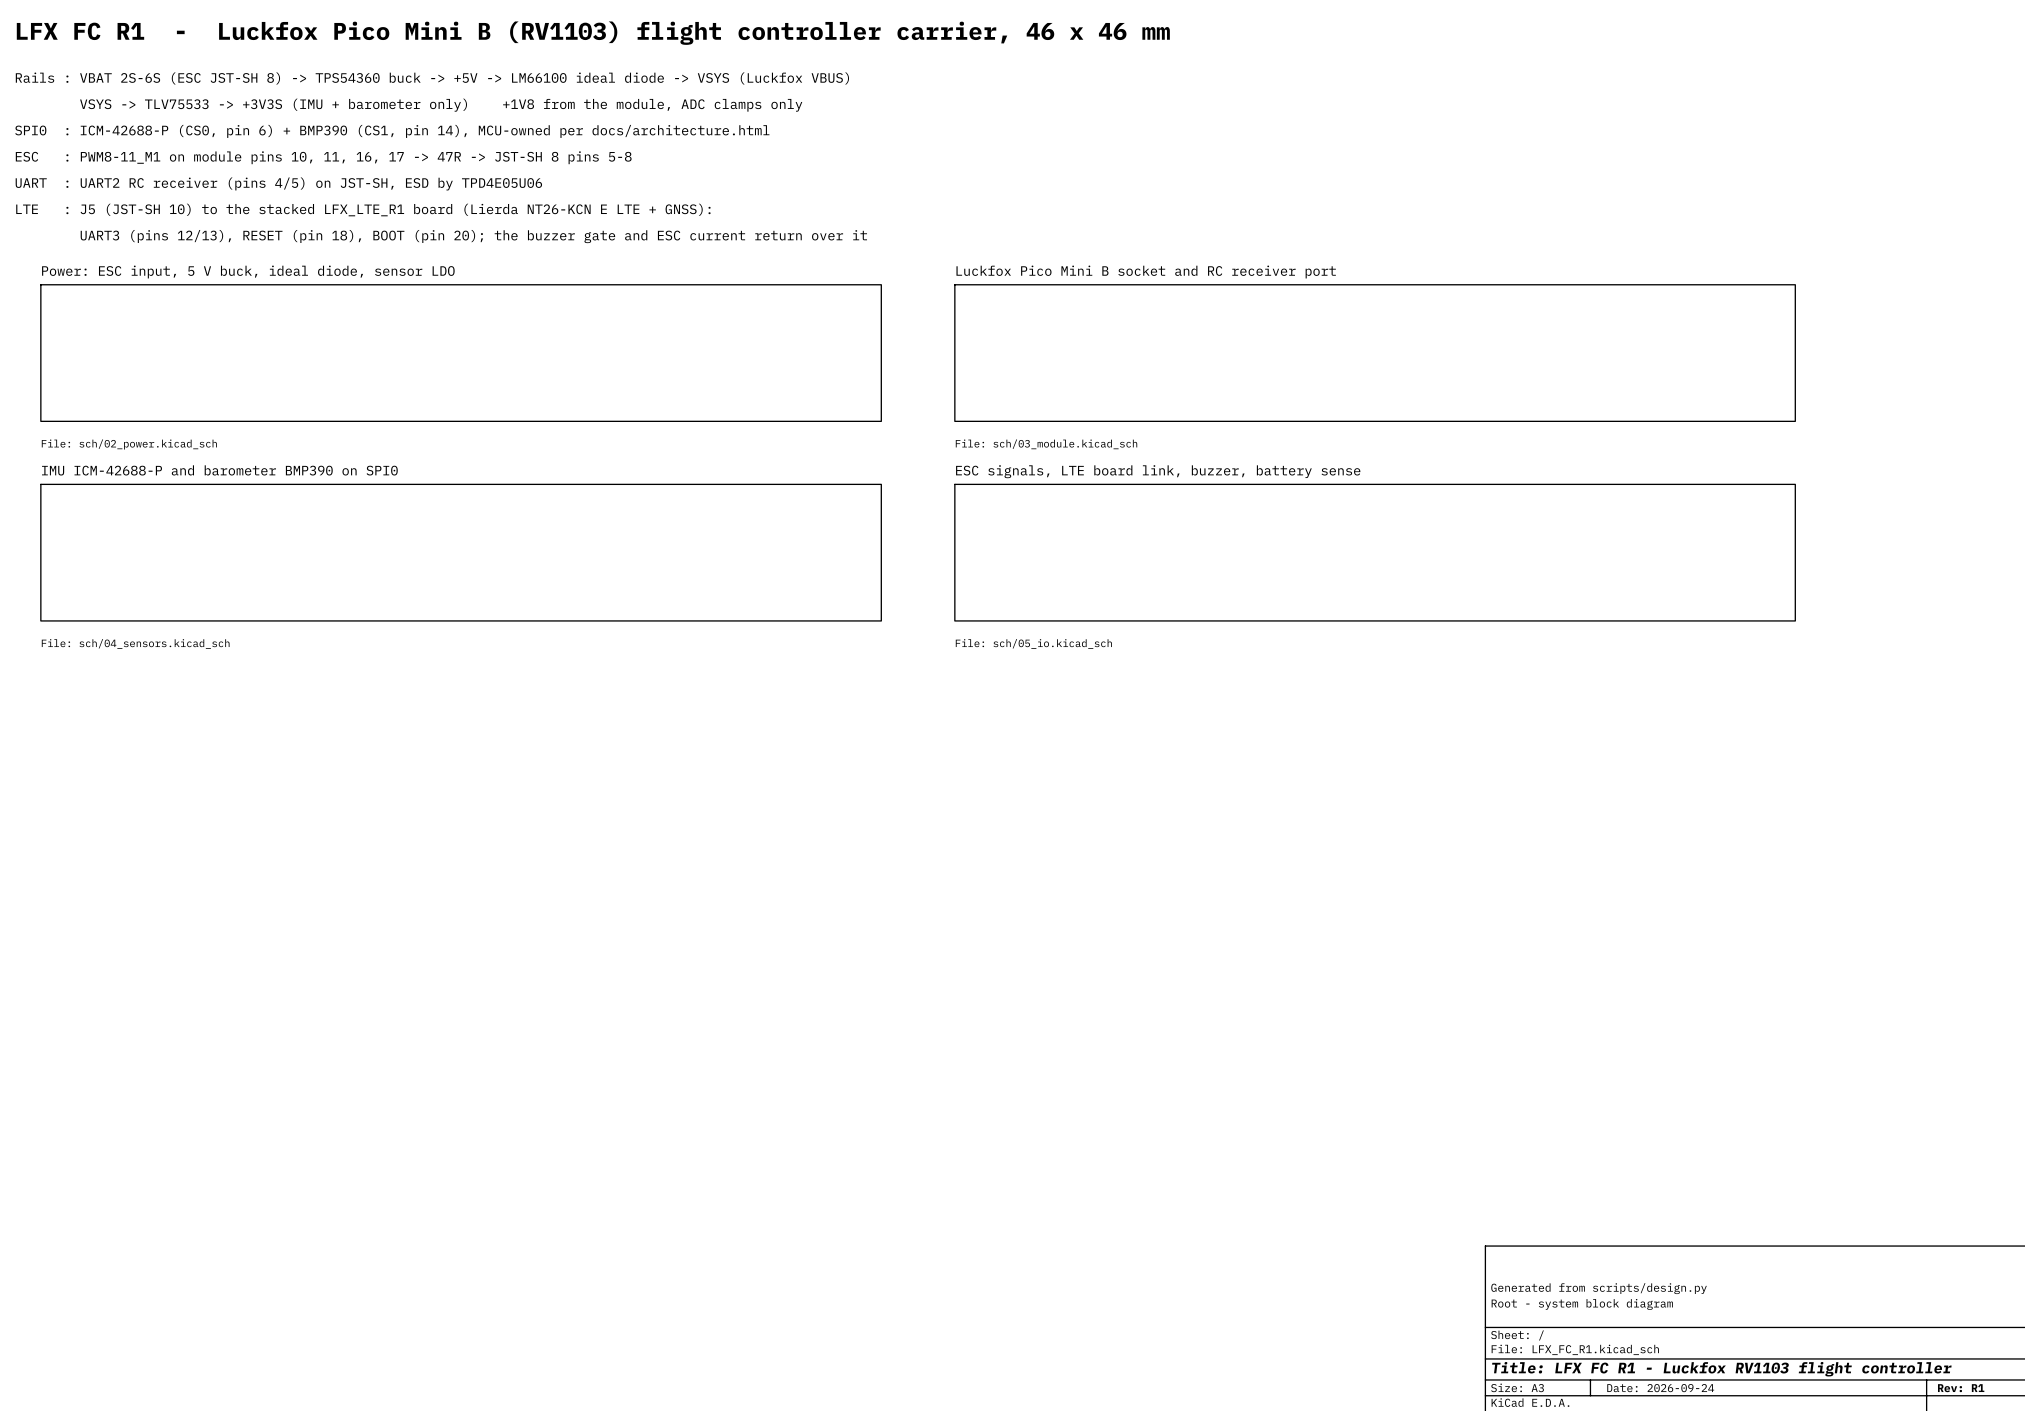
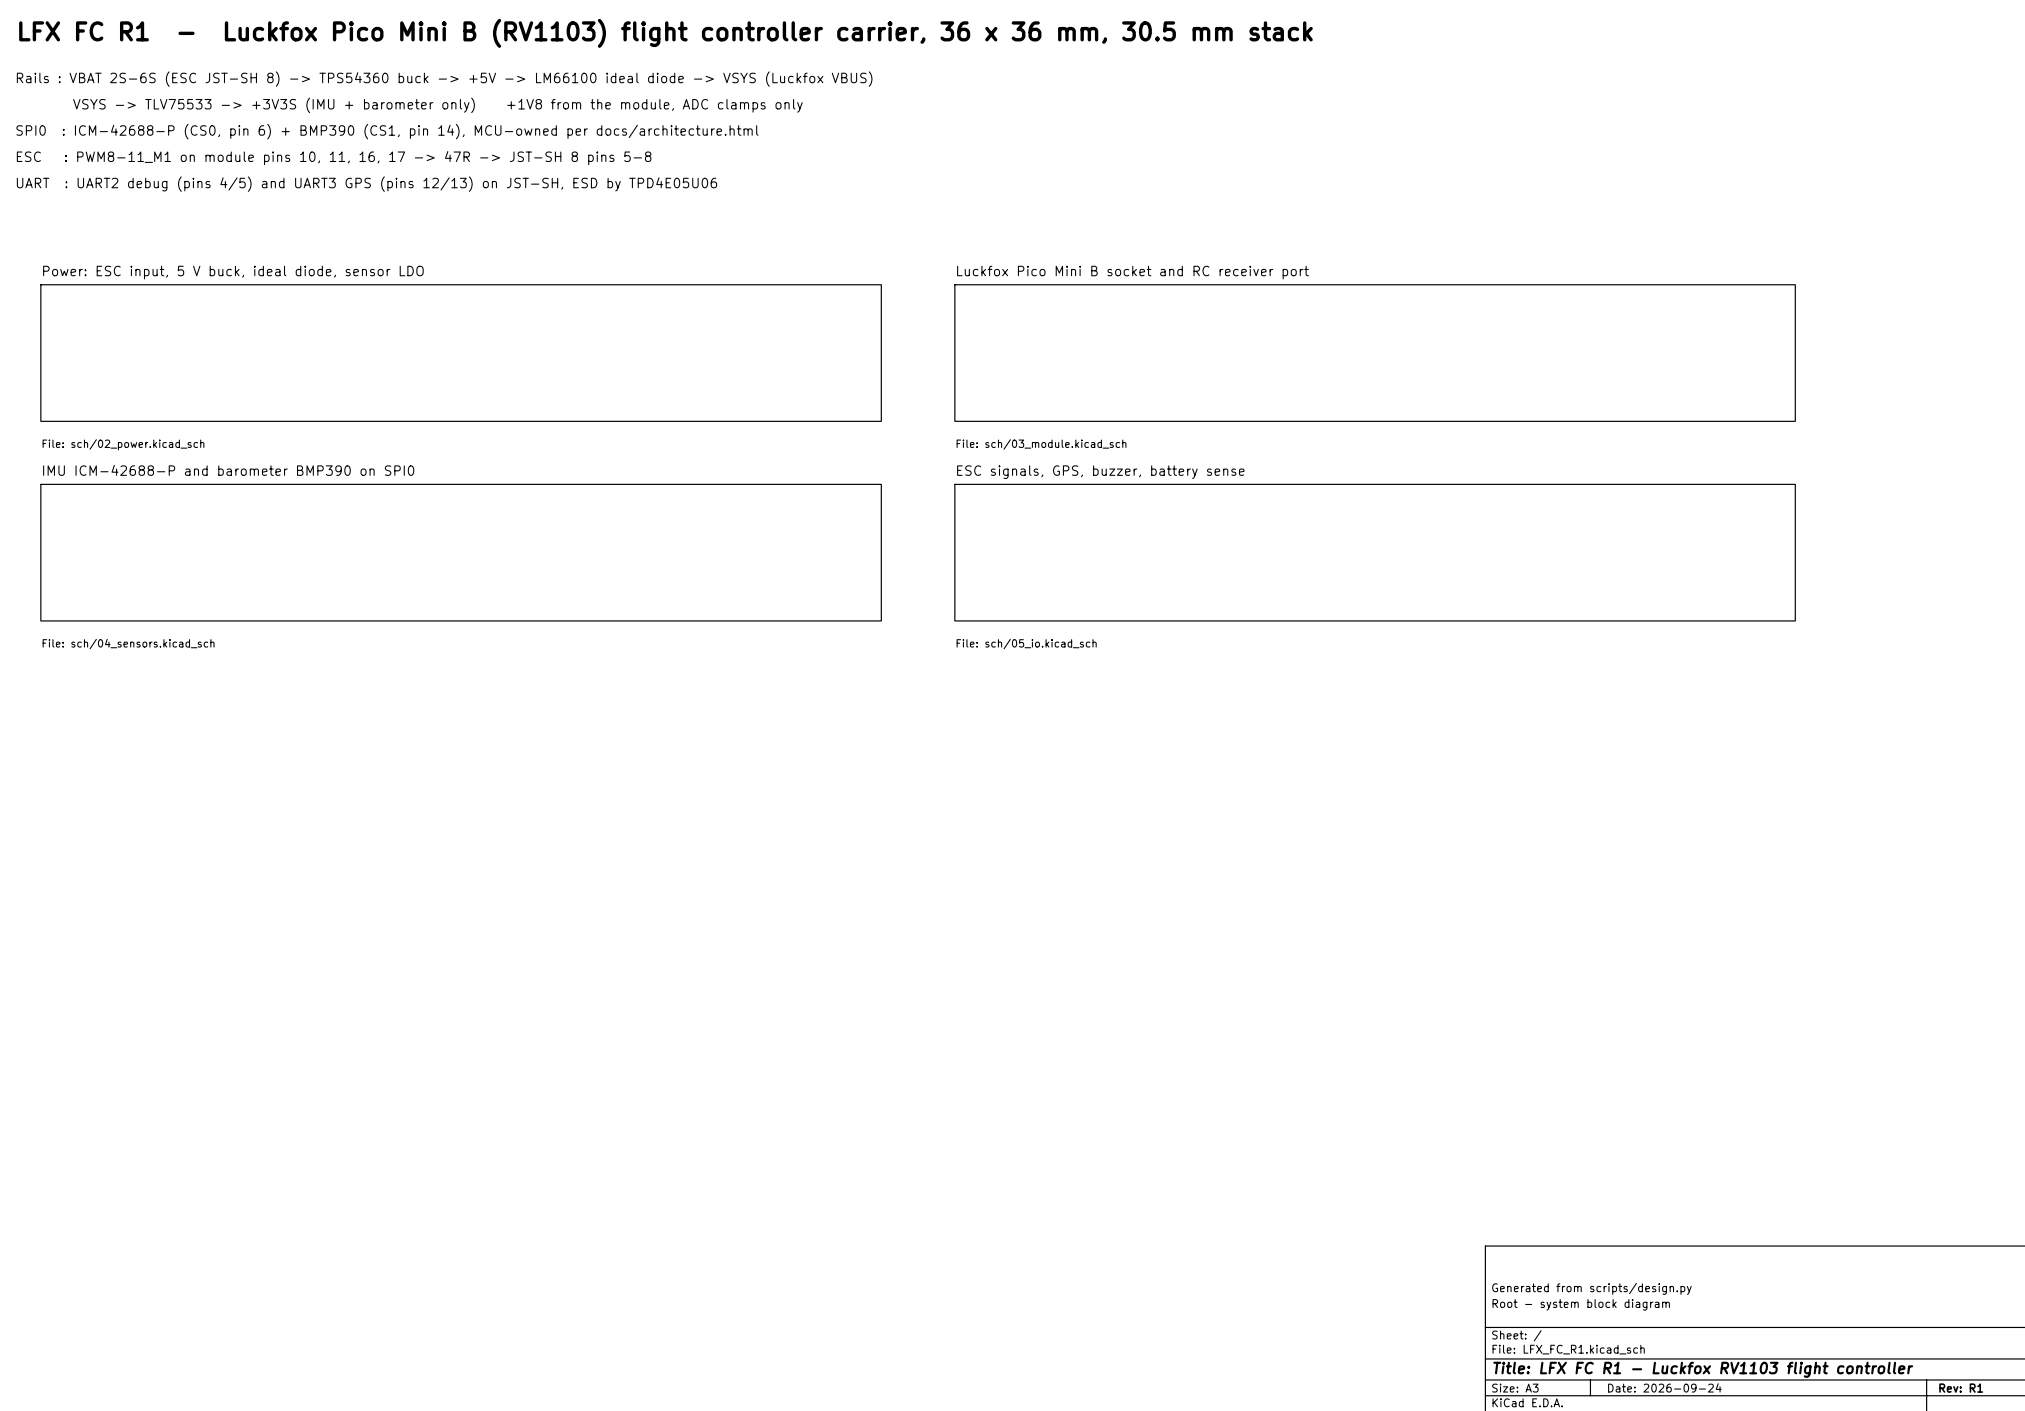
text: LFX FC R1 - Luckfox Pico Mini B (RV1103) flight controller carrier, 46 x 46 mm (593, 33) -> LFX FC R1 - Luckfox Pico Mini B (RV1103) flight controller carrier, 36 x 36 mm, 30.5 mm stack (665, 33)
text: UART : UART2 RC receiver (pins 4/5) on JST-SH, ESD by TPD4E05U06 (278, 183) -> UART : UART2 debug (pins 4/5) and UART3 GPS (pins 12/13) on JST-SH, ESD by TPD4E05U06 (366, 184)
text: LTE : J5 (JST-SH 10) to the stacked LFX_LTE_R1 board (Lierda NT26-KCN E LTE + GNSS): (363, 210) -> none
text: UART3 (pins 12/13), RESET (pin 18), BOOT (pin 20); the buzzer gate and ESC current return over it (473, 236) -> none
sheet ESC signals, LTE board link, buzzer, battery sense name: ESC signals, LTE board link, buzzer, battery sense (1158, 471) -> ESC signals, GPS, buzzer, battery sense (1100, 472)

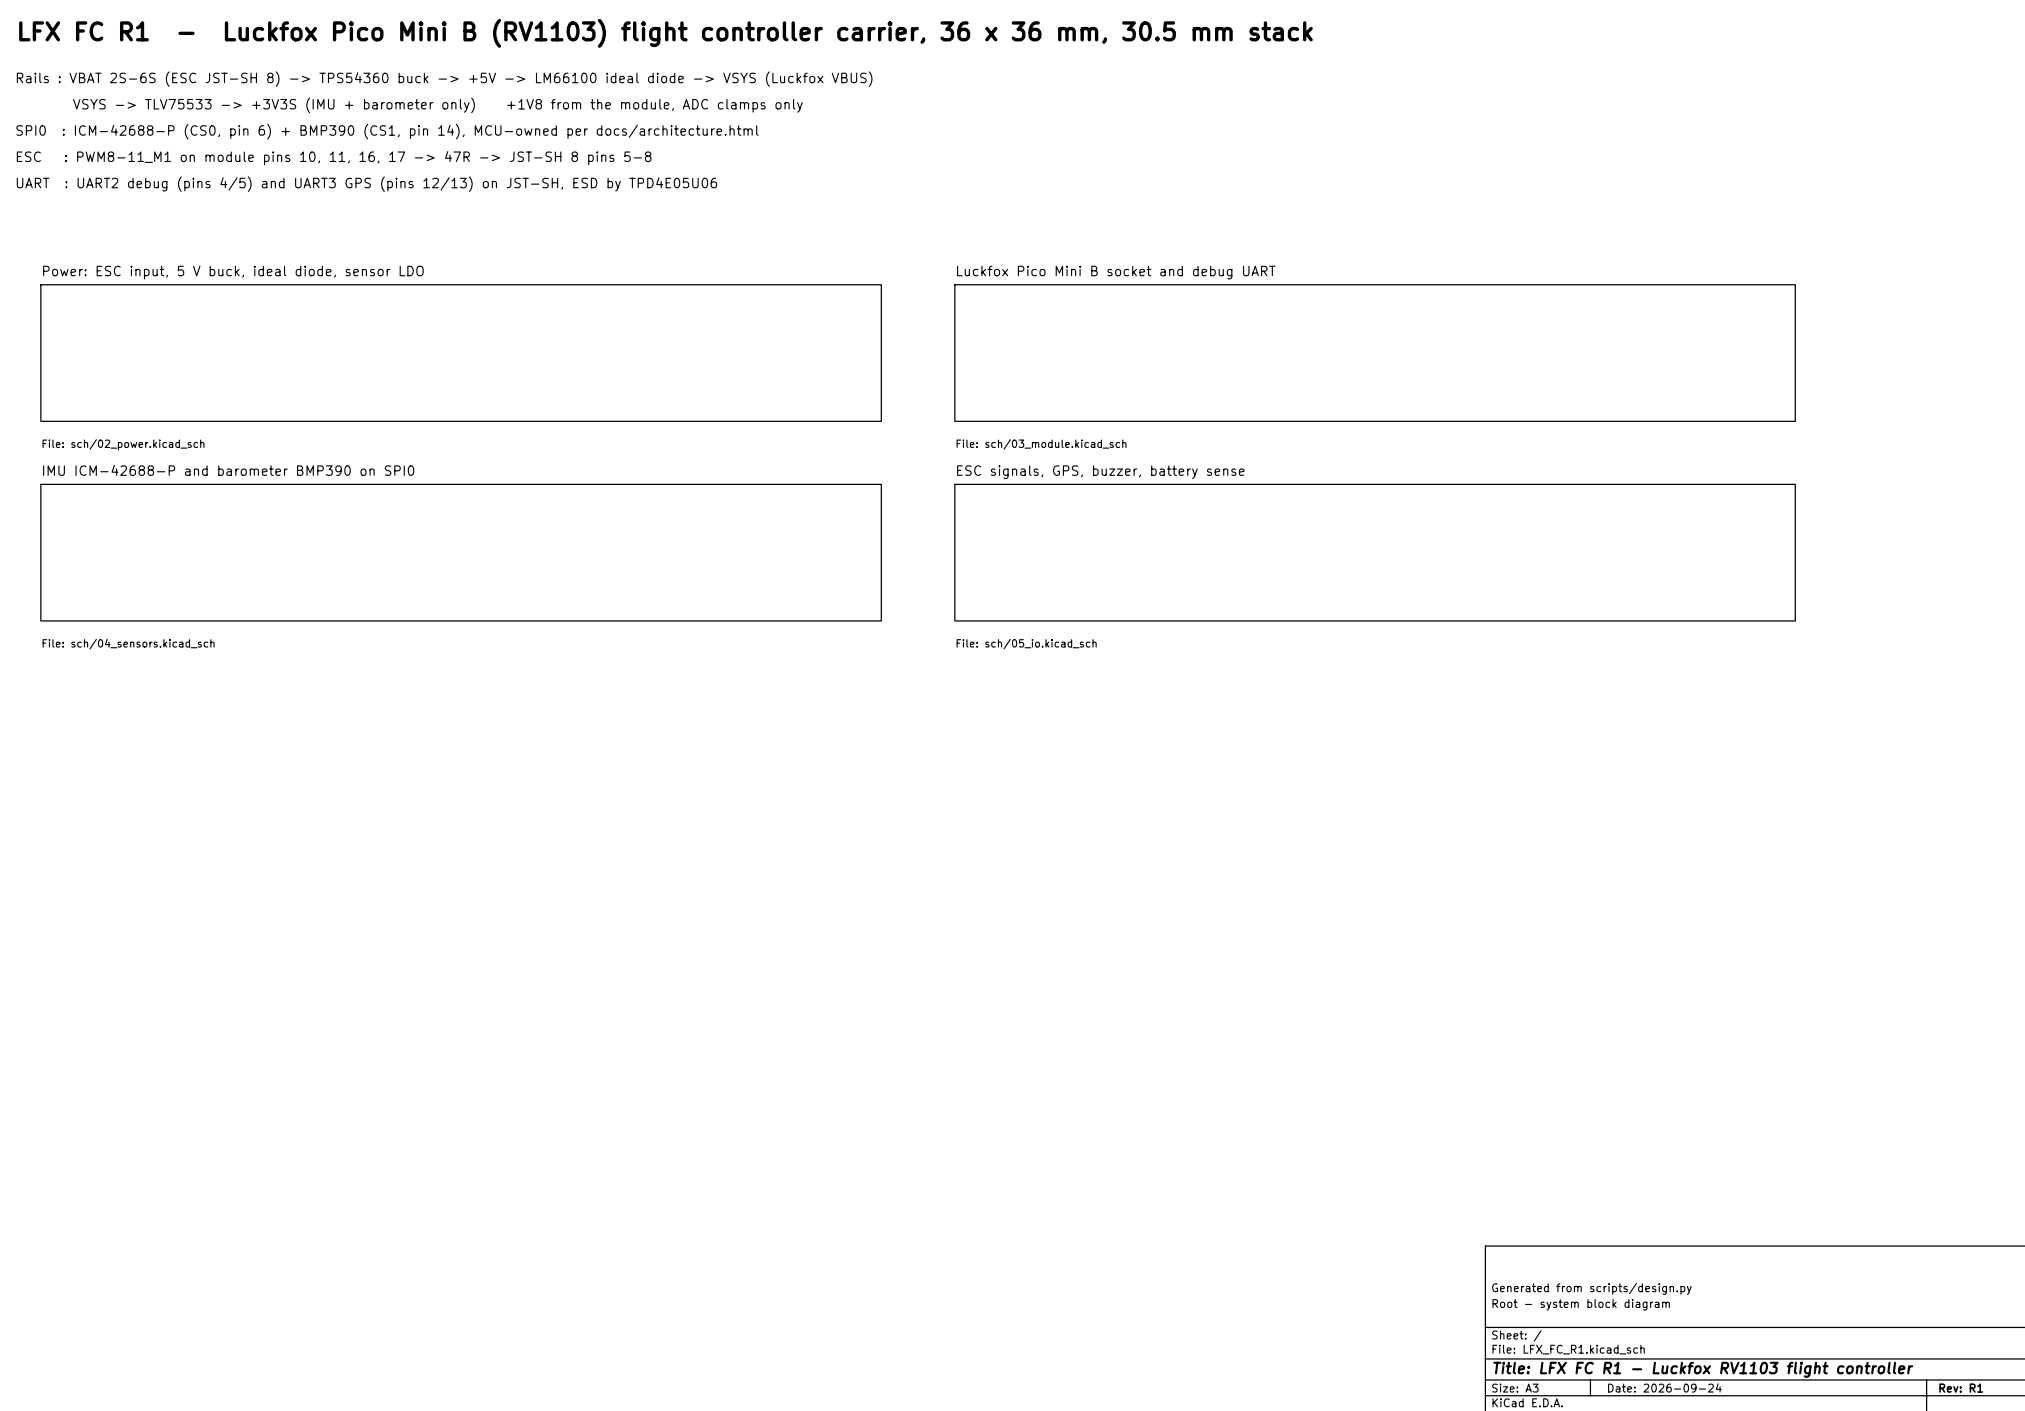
sheet Luckfox Pico Mini B socket and RC receiver port name: Luckfox Pico Mini B socket and RC receiver port (1133, 272) -> Luckfox Pico Mini B socket and debug UART (1116, 272)

